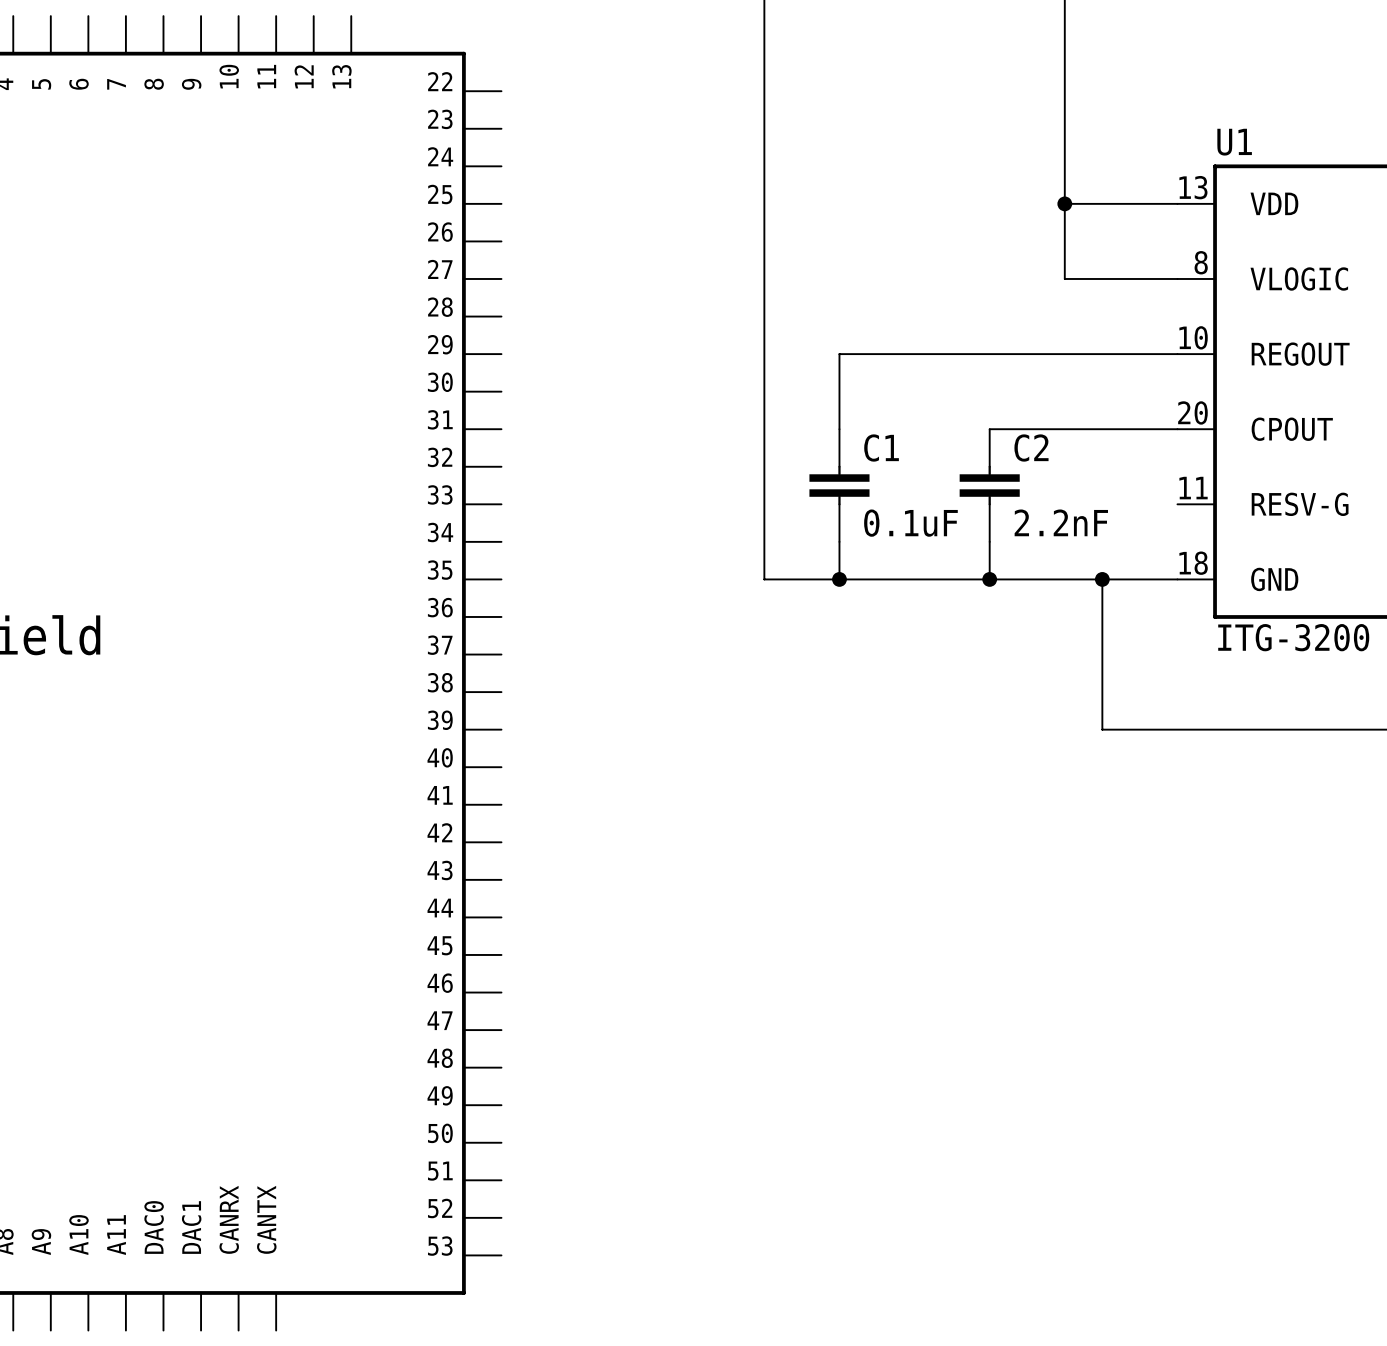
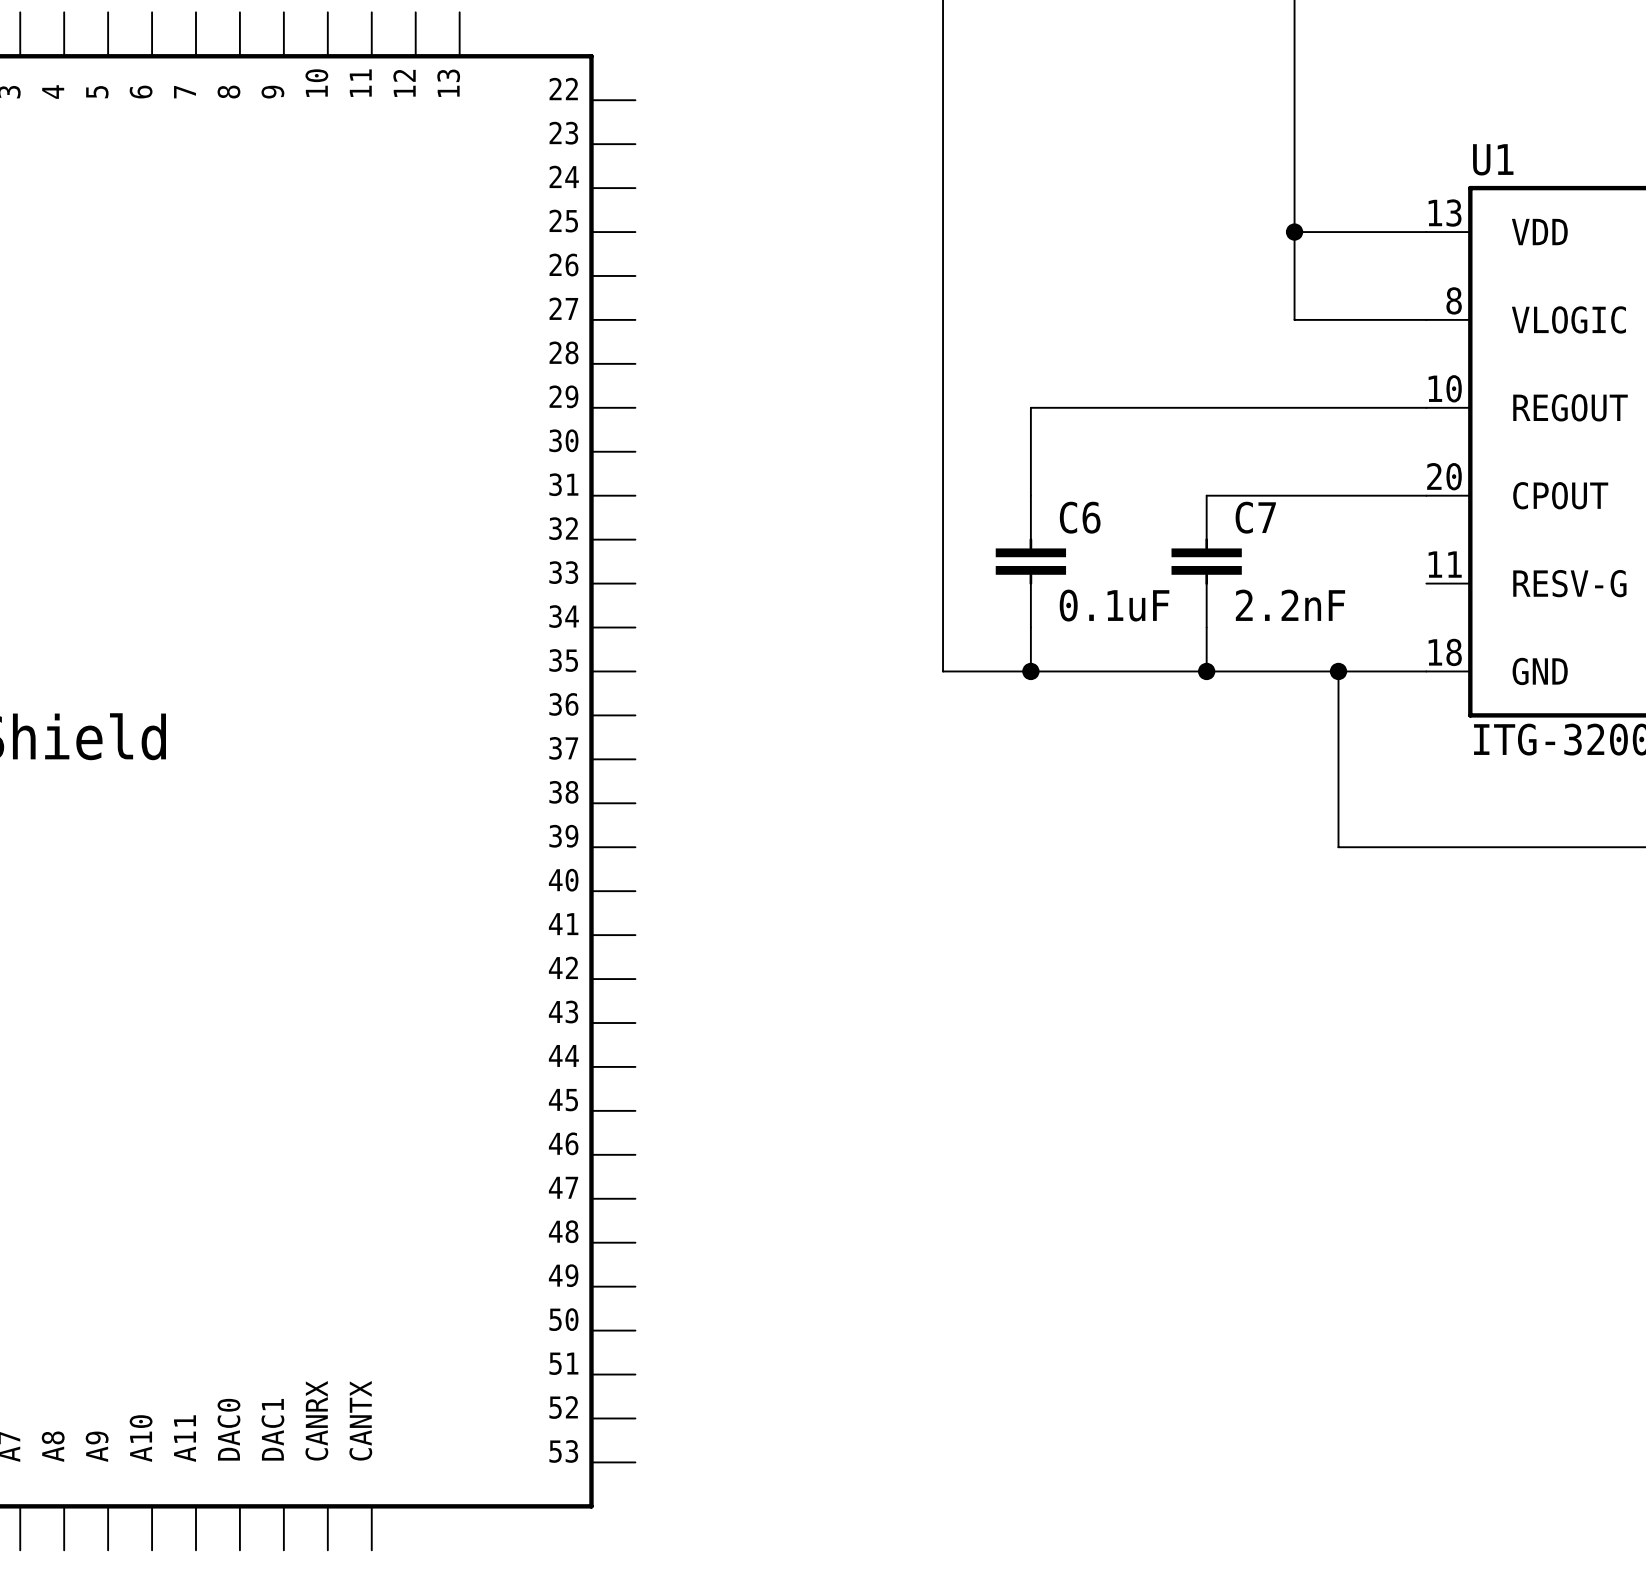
C1 name: C1 (881, 448) -> C6 (1080, 517)
C2 name: C2 (1031, 448) -> C7 (1255, 517)

